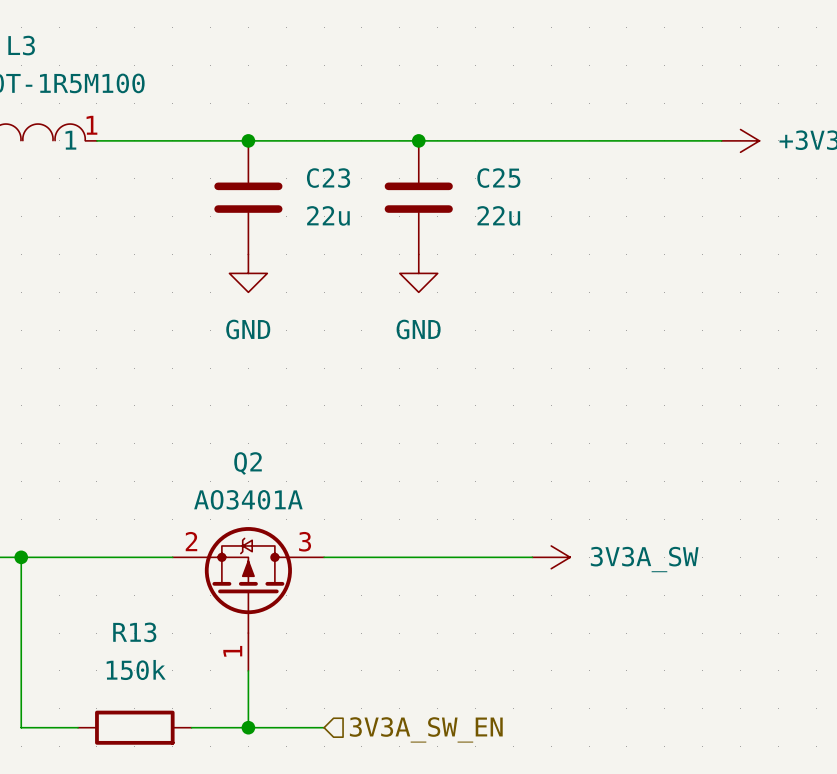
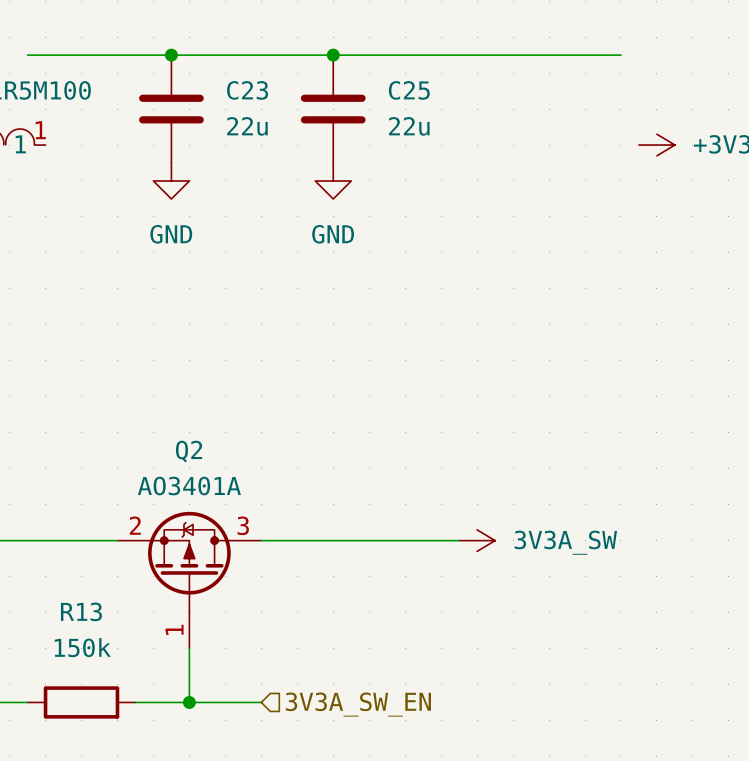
junction: none -> (171, 55)
junction: none -> (333, 55)
wire: (96, 140) (721, 140) -> (27, 55) (620, 55)
junction: (248, 140) -> none
junction: (418, 140) -> none
power symbol: none -> GND (171, 180)
power symbol: none -> GND (333, 180)
C23 position: (248, 197) -> (171, 109)
C25 position: (418, 197) -> (333, 109)
power symbol: GND (248, 273) -> none
power symbol: GND (418, 273) -> none

